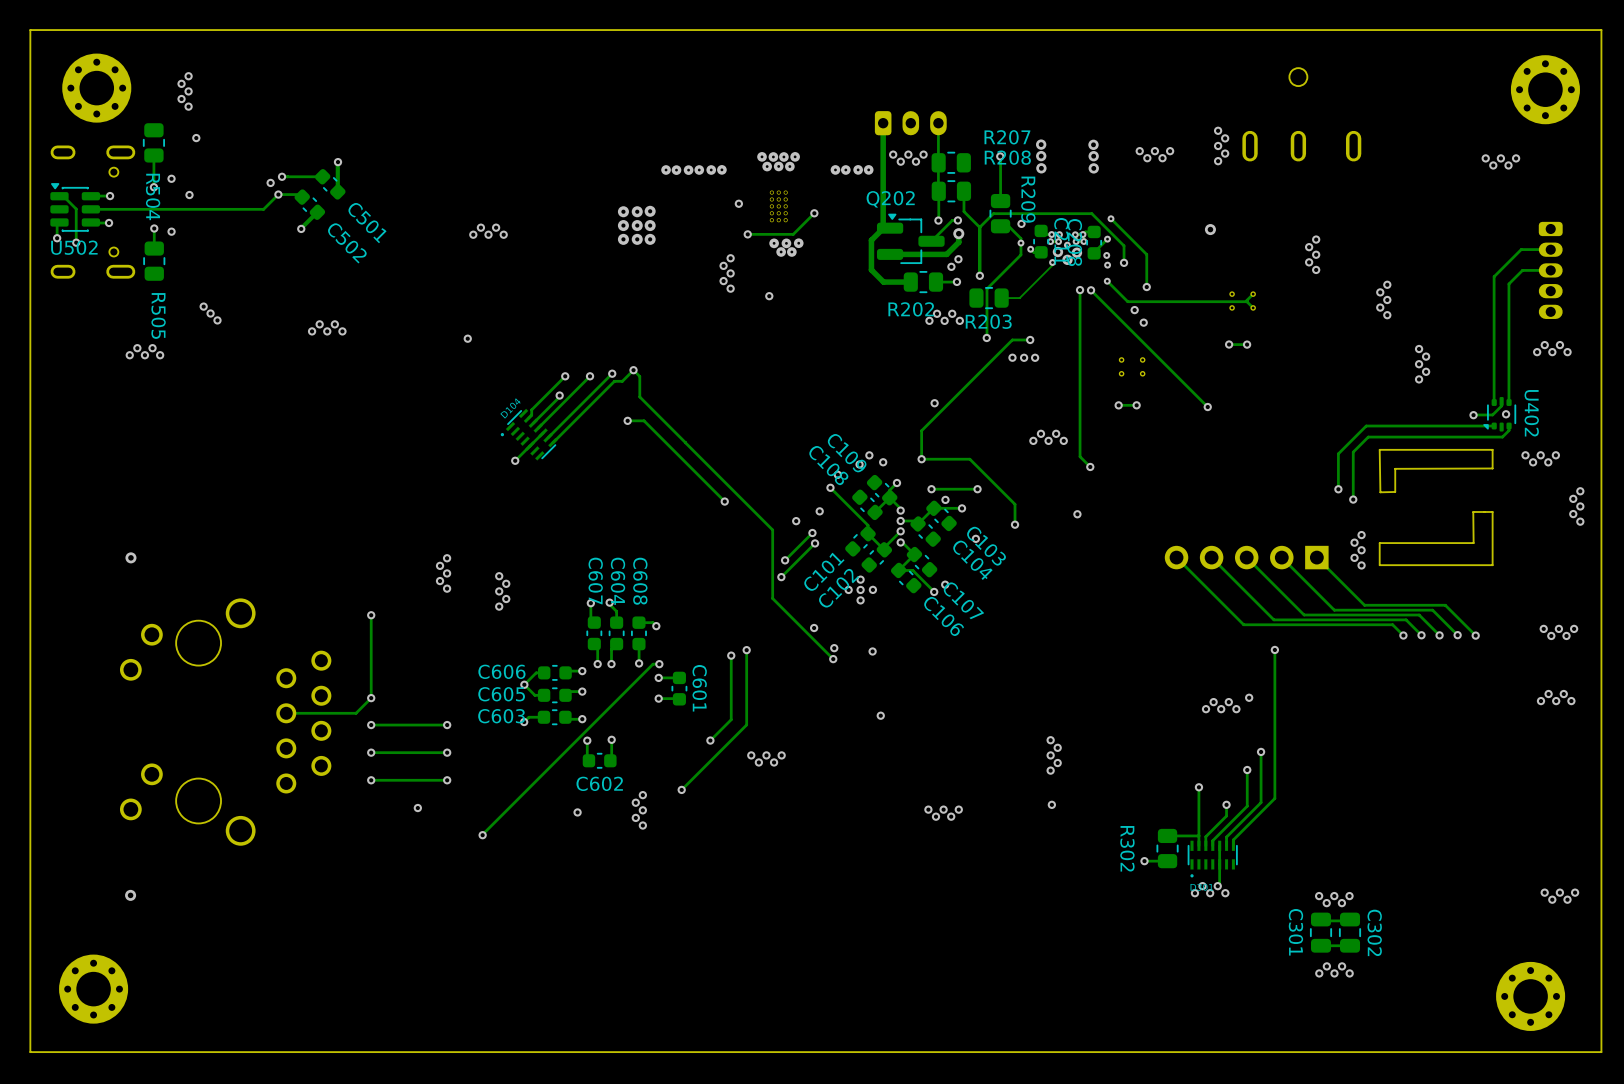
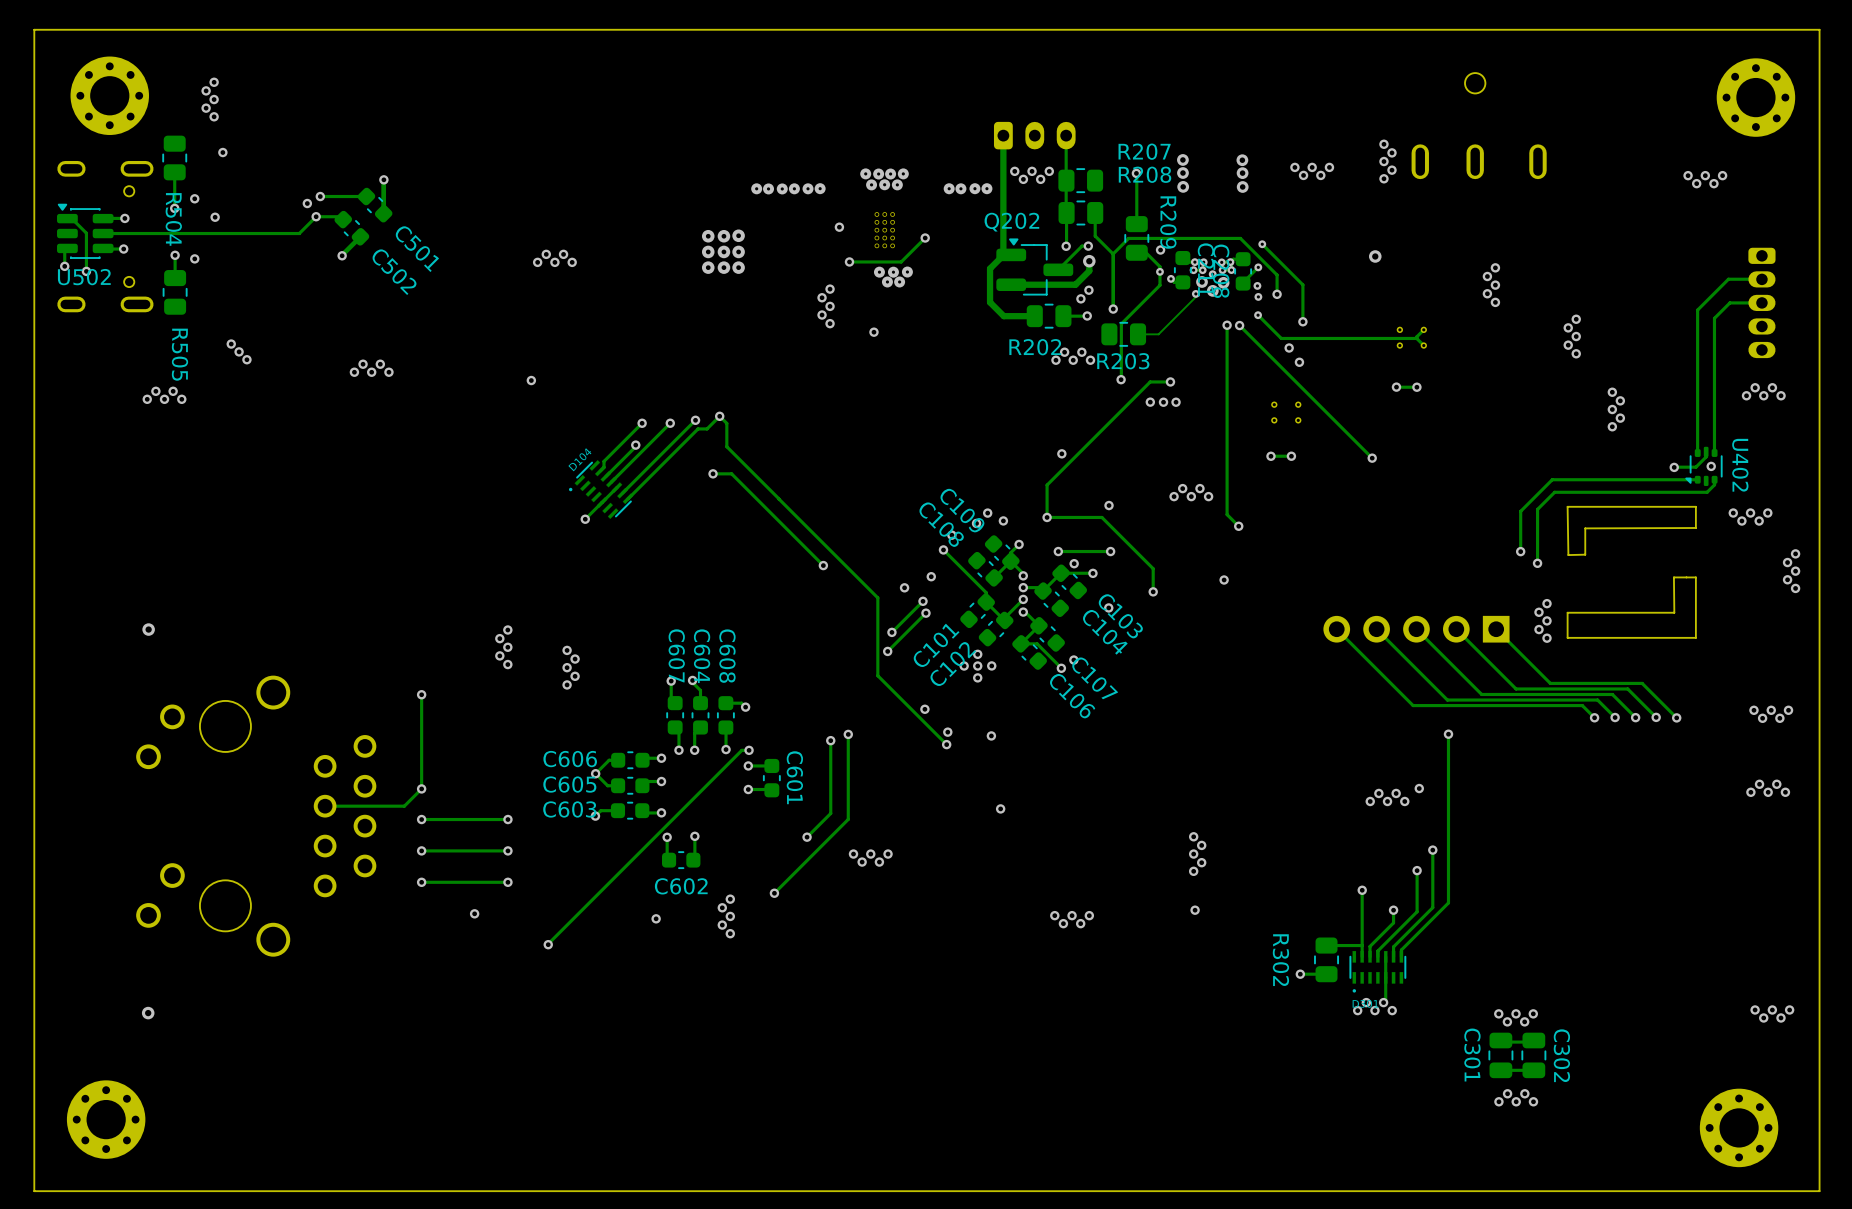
via: none -> (1109, 505)

